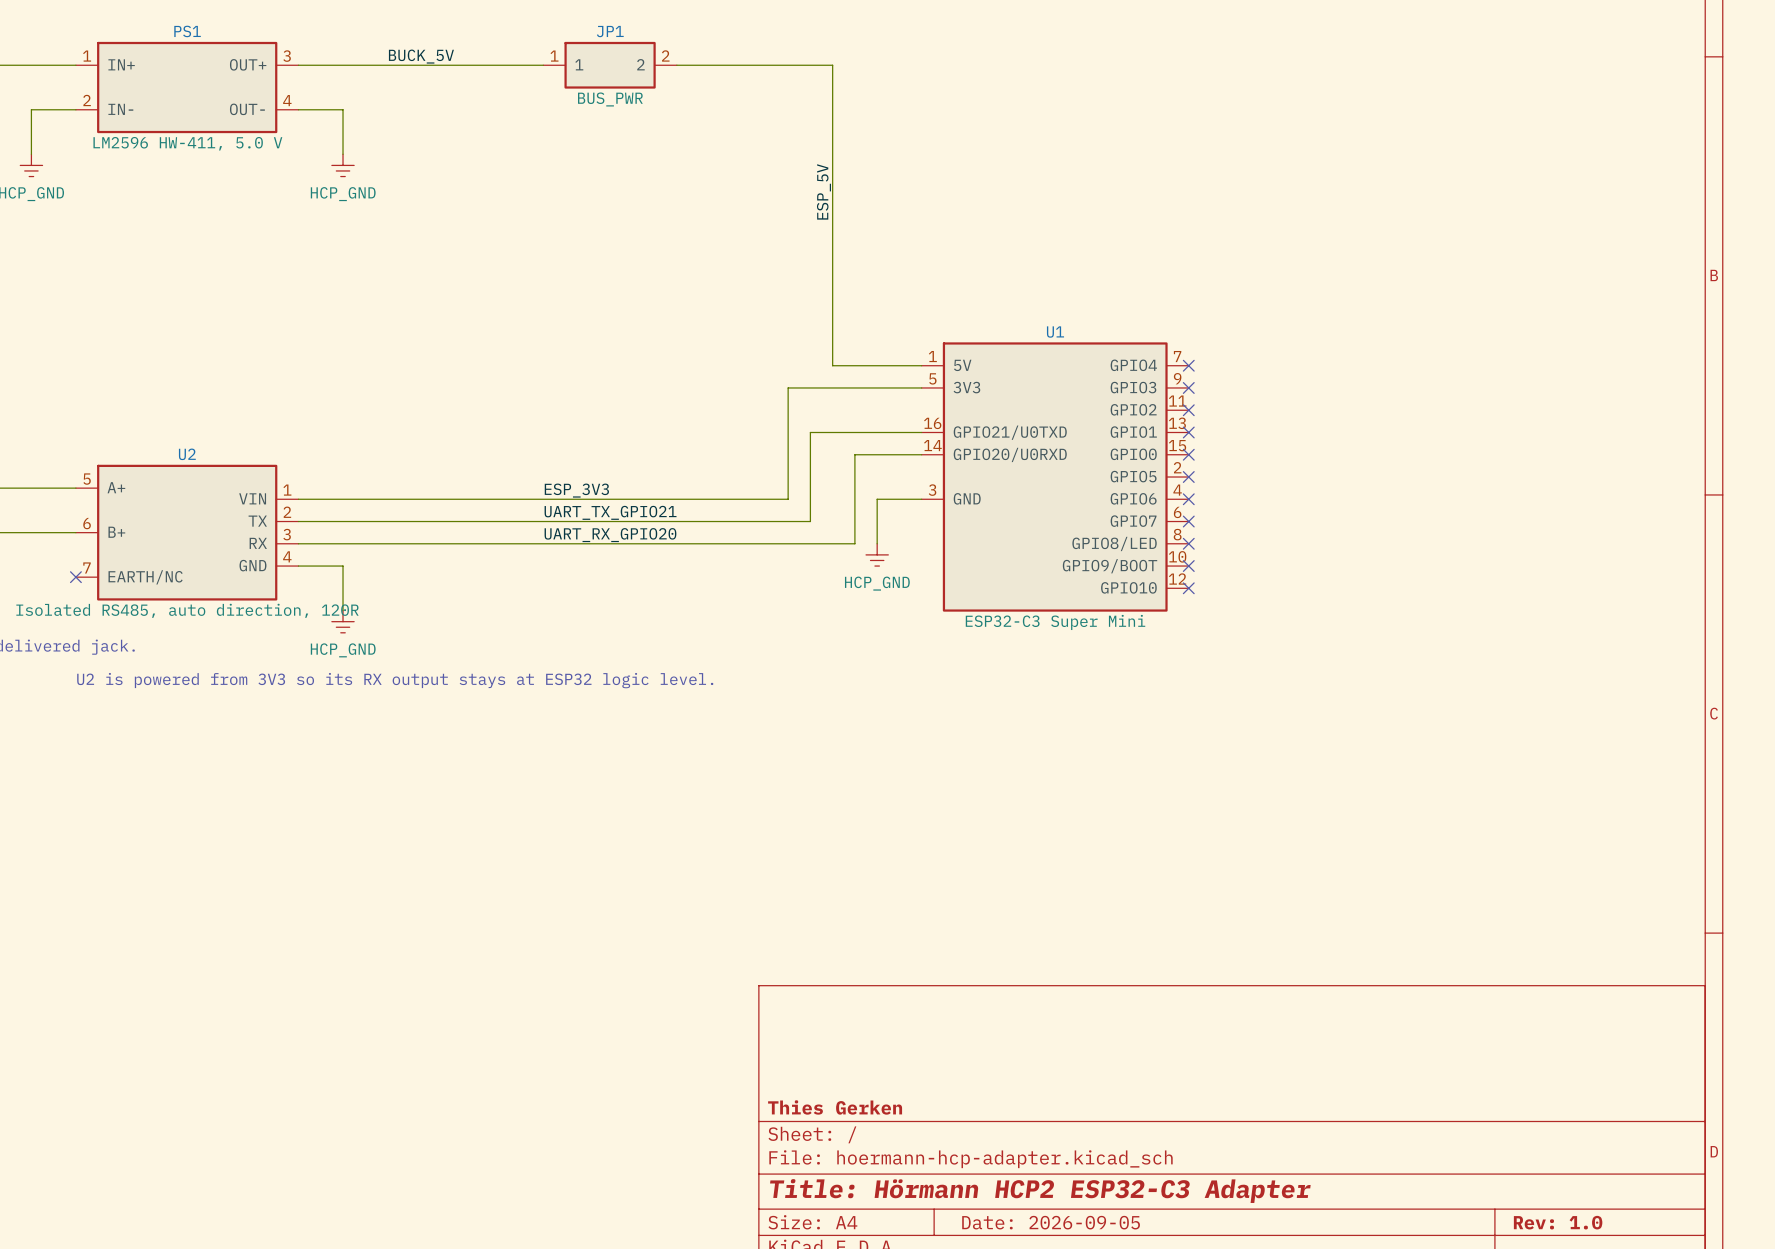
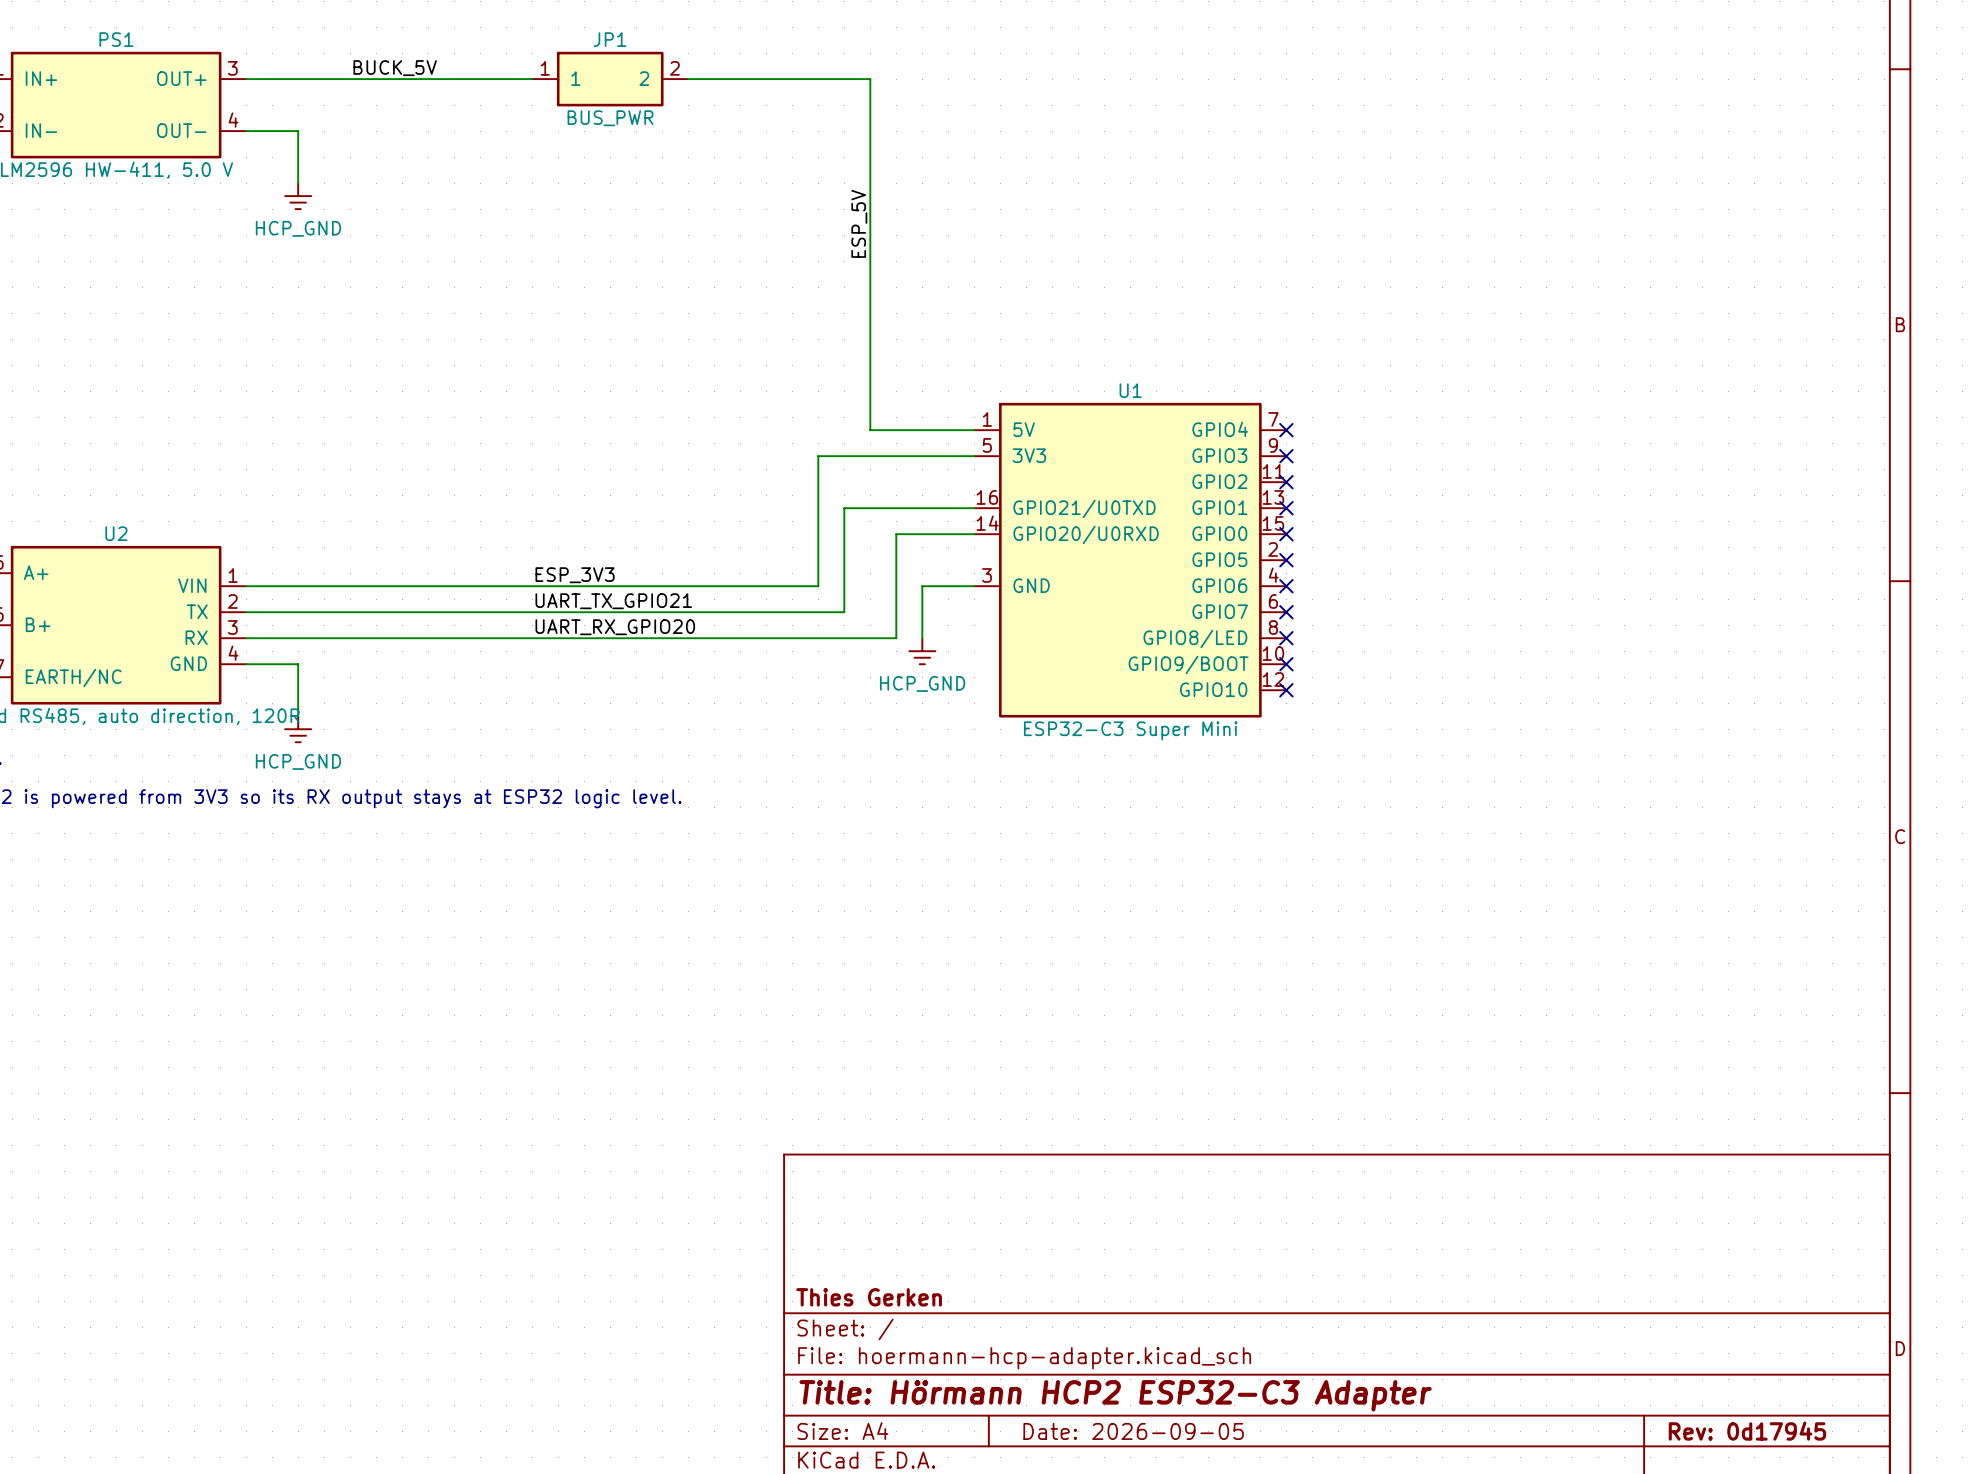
title block: Rev: 1.0 (1558, 1222) -> Rev: 0d17945 (1747, 1431)

